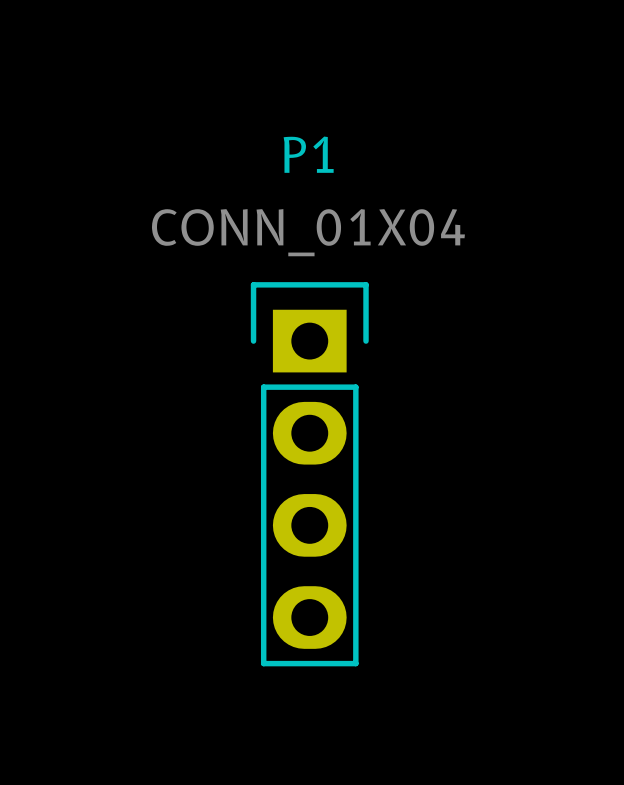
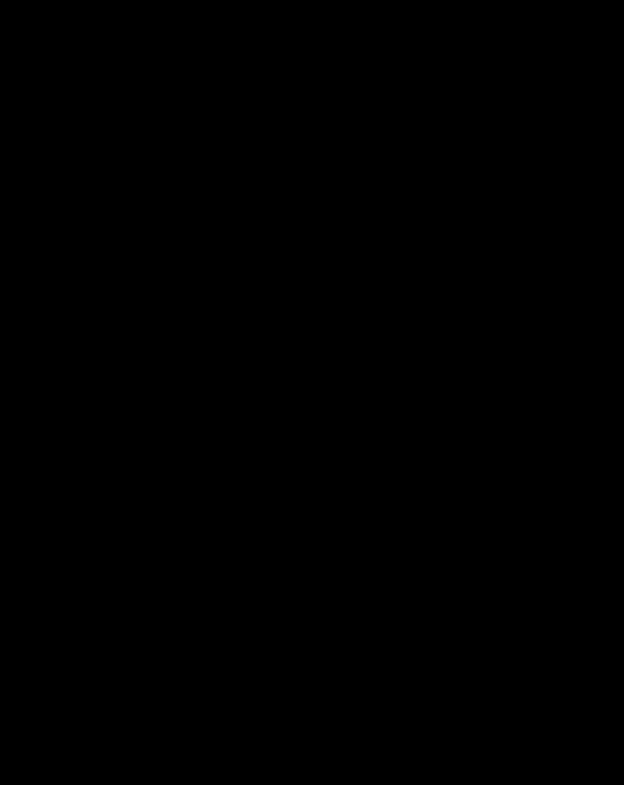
P1: CONN_01X04 (309, 474) -> none

